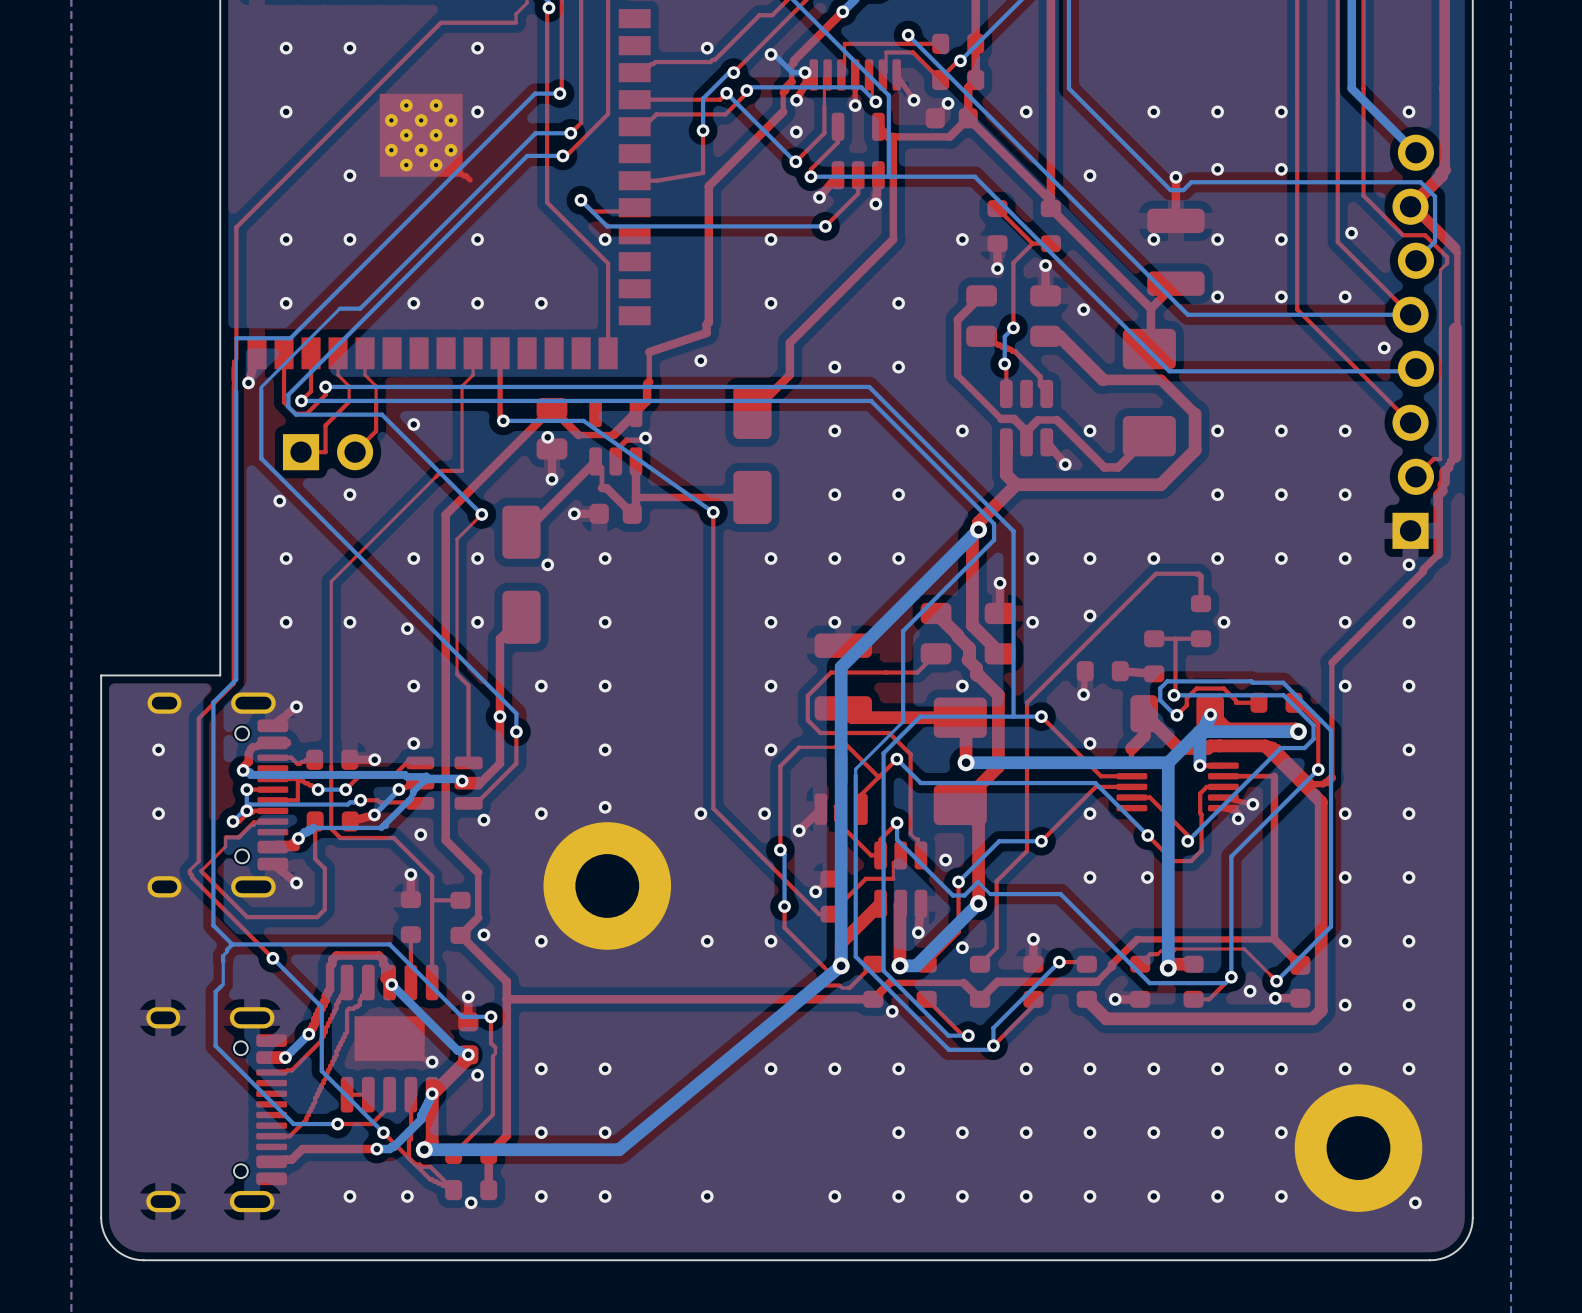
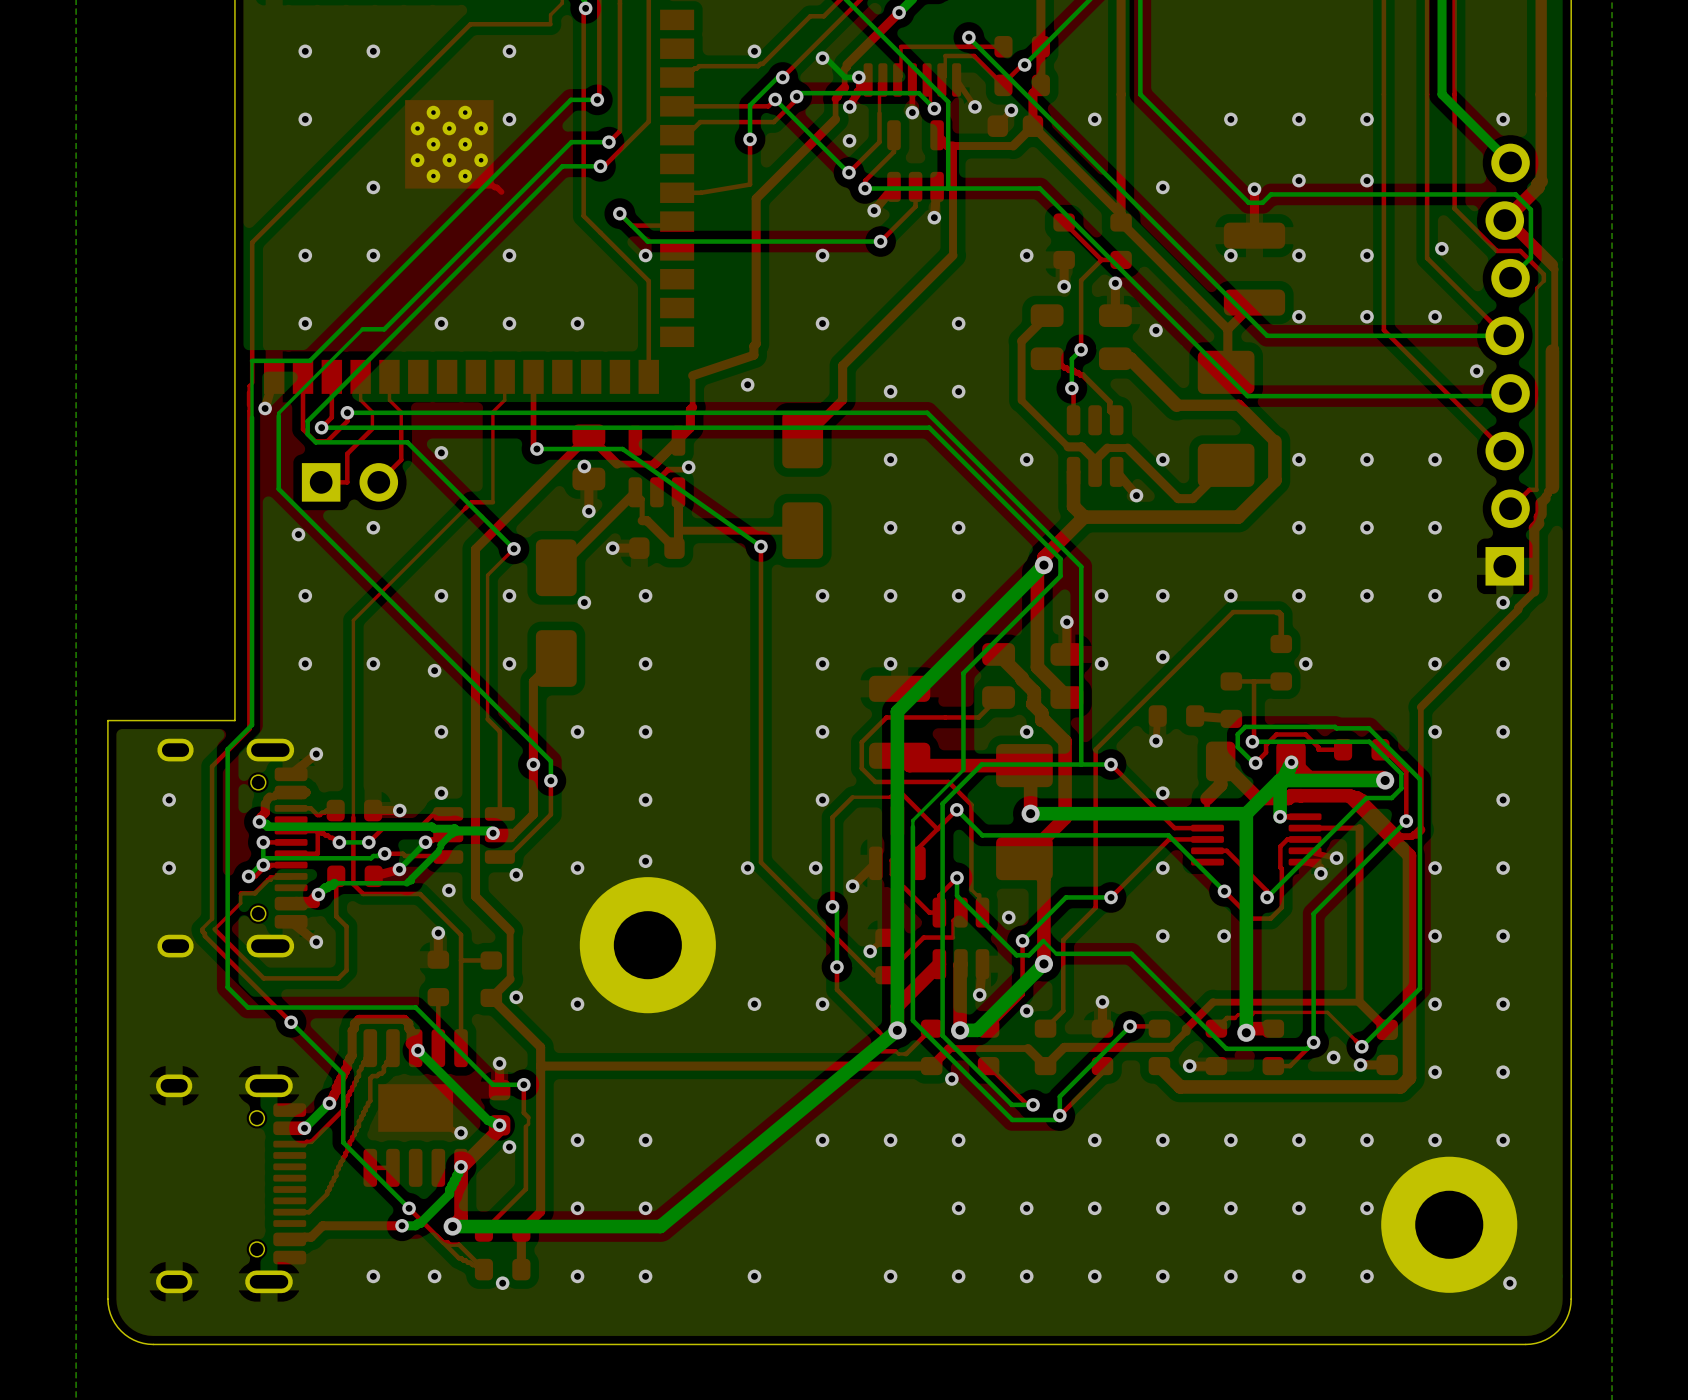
bottom track: (232, 944) (223, 955) (223, 961) -> none
bottom track: (223, 961) (223, 984) (215, 991) (215, 1045) (293, 1124) (337, 1124) -> none
top track: (389, 1094) (389, 1106) (371, 1124) (337, 1124) -> none
top track: (411, 1094) (408, 1158) -> none
via: (337, 1124) -> none

